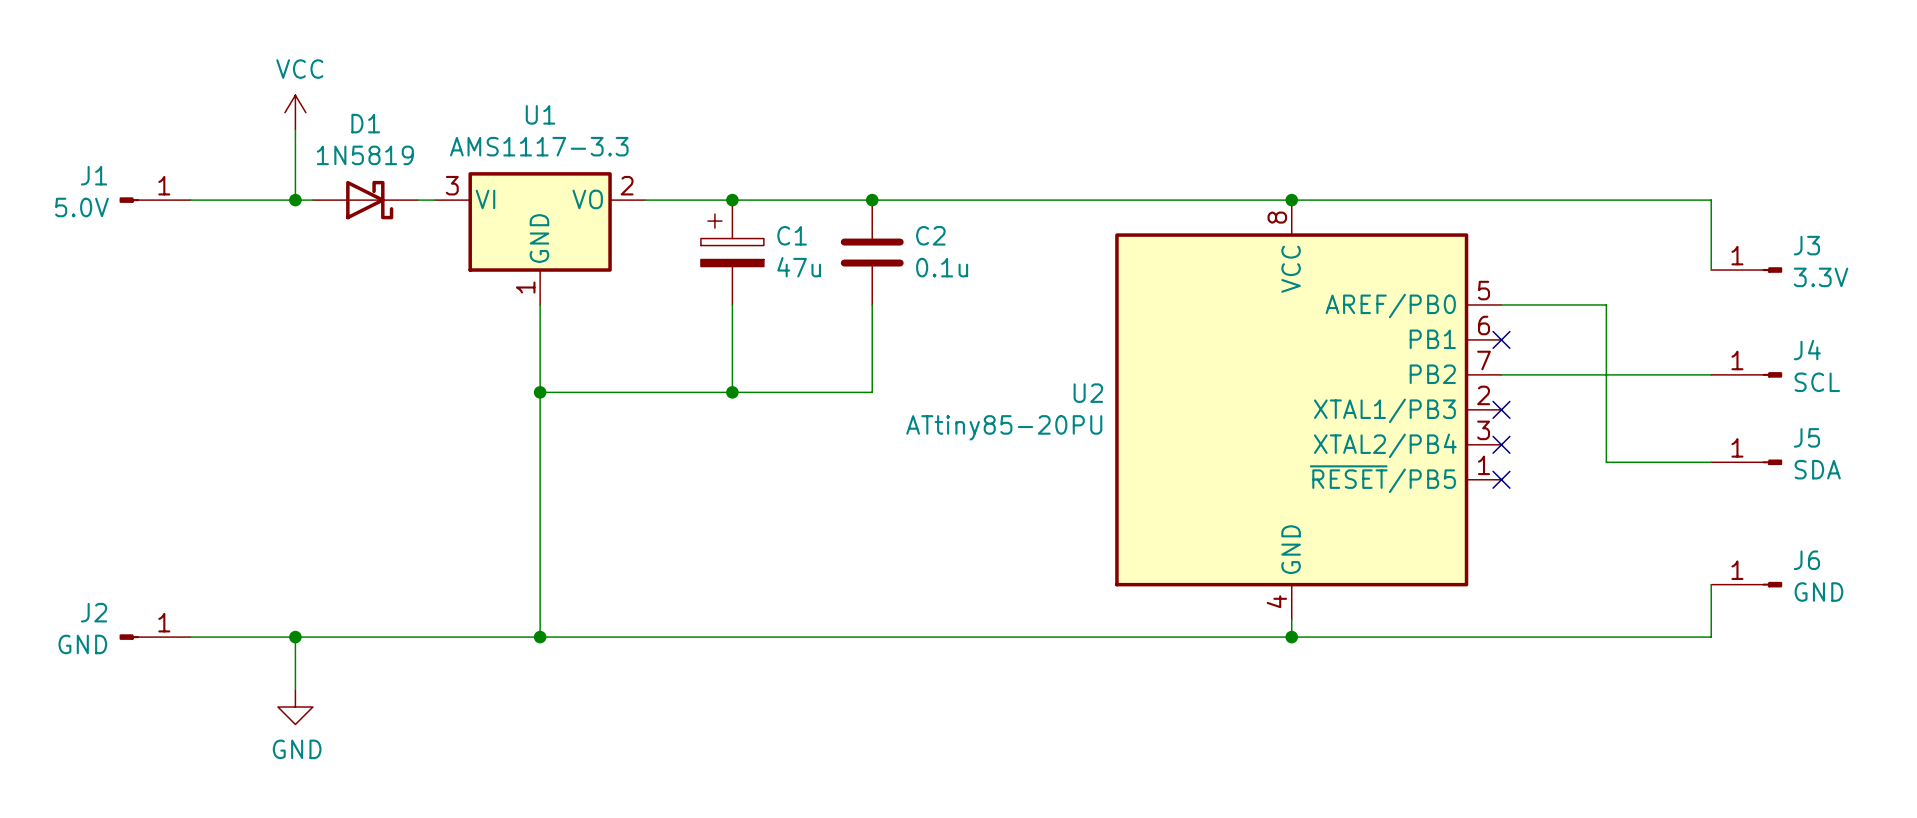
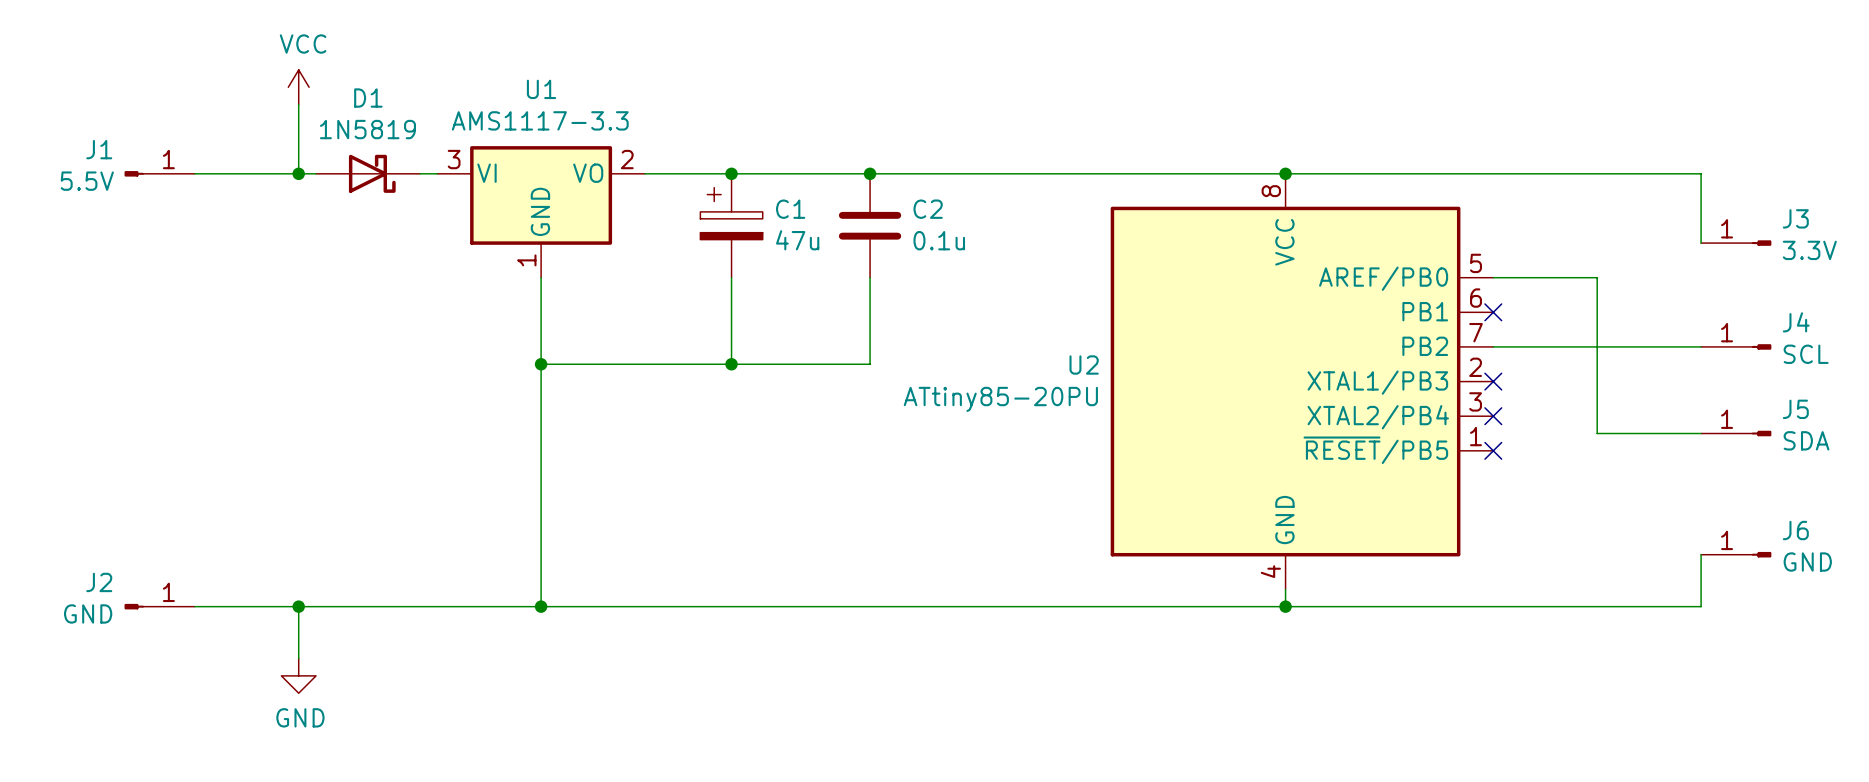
J1 value: 5.0V (81, 207) -> 5.5V (87, 181)

